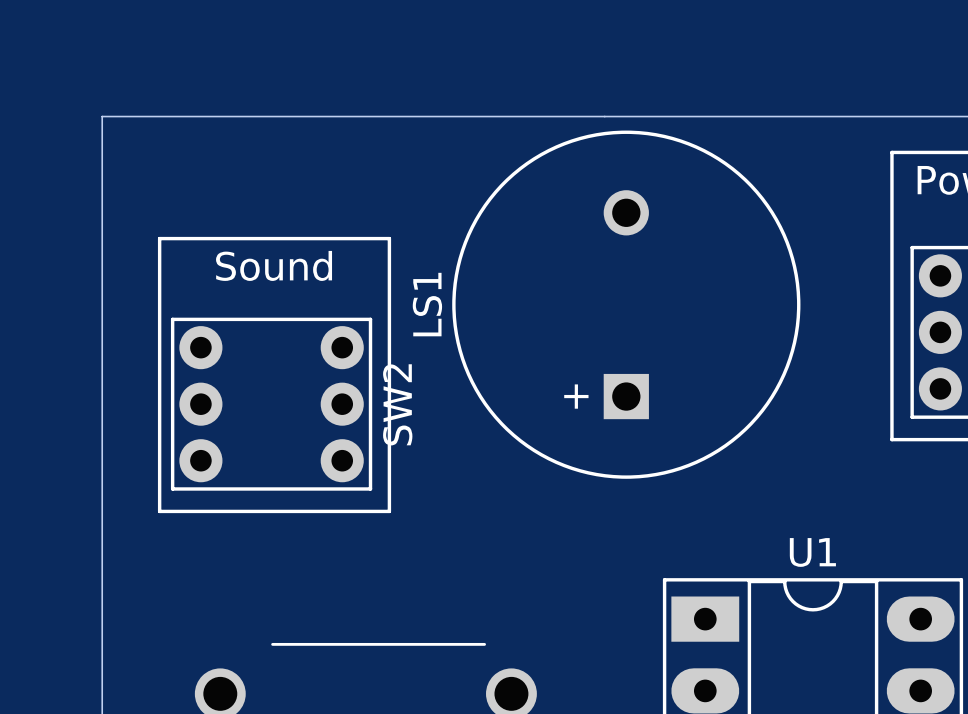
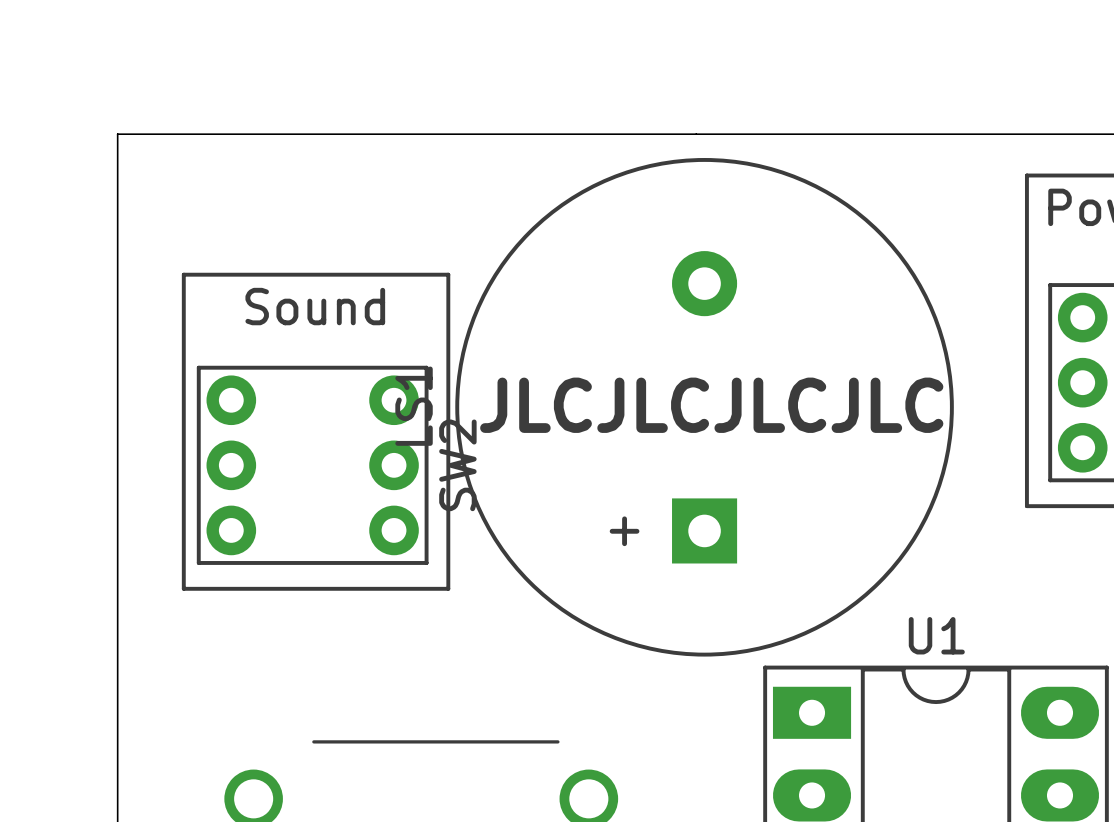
LS1 footprint: [452, 130, 801, 479] -> [455, 158, 954, 657]
text: none -> JLCJLCJLCJLC (711, 405)

